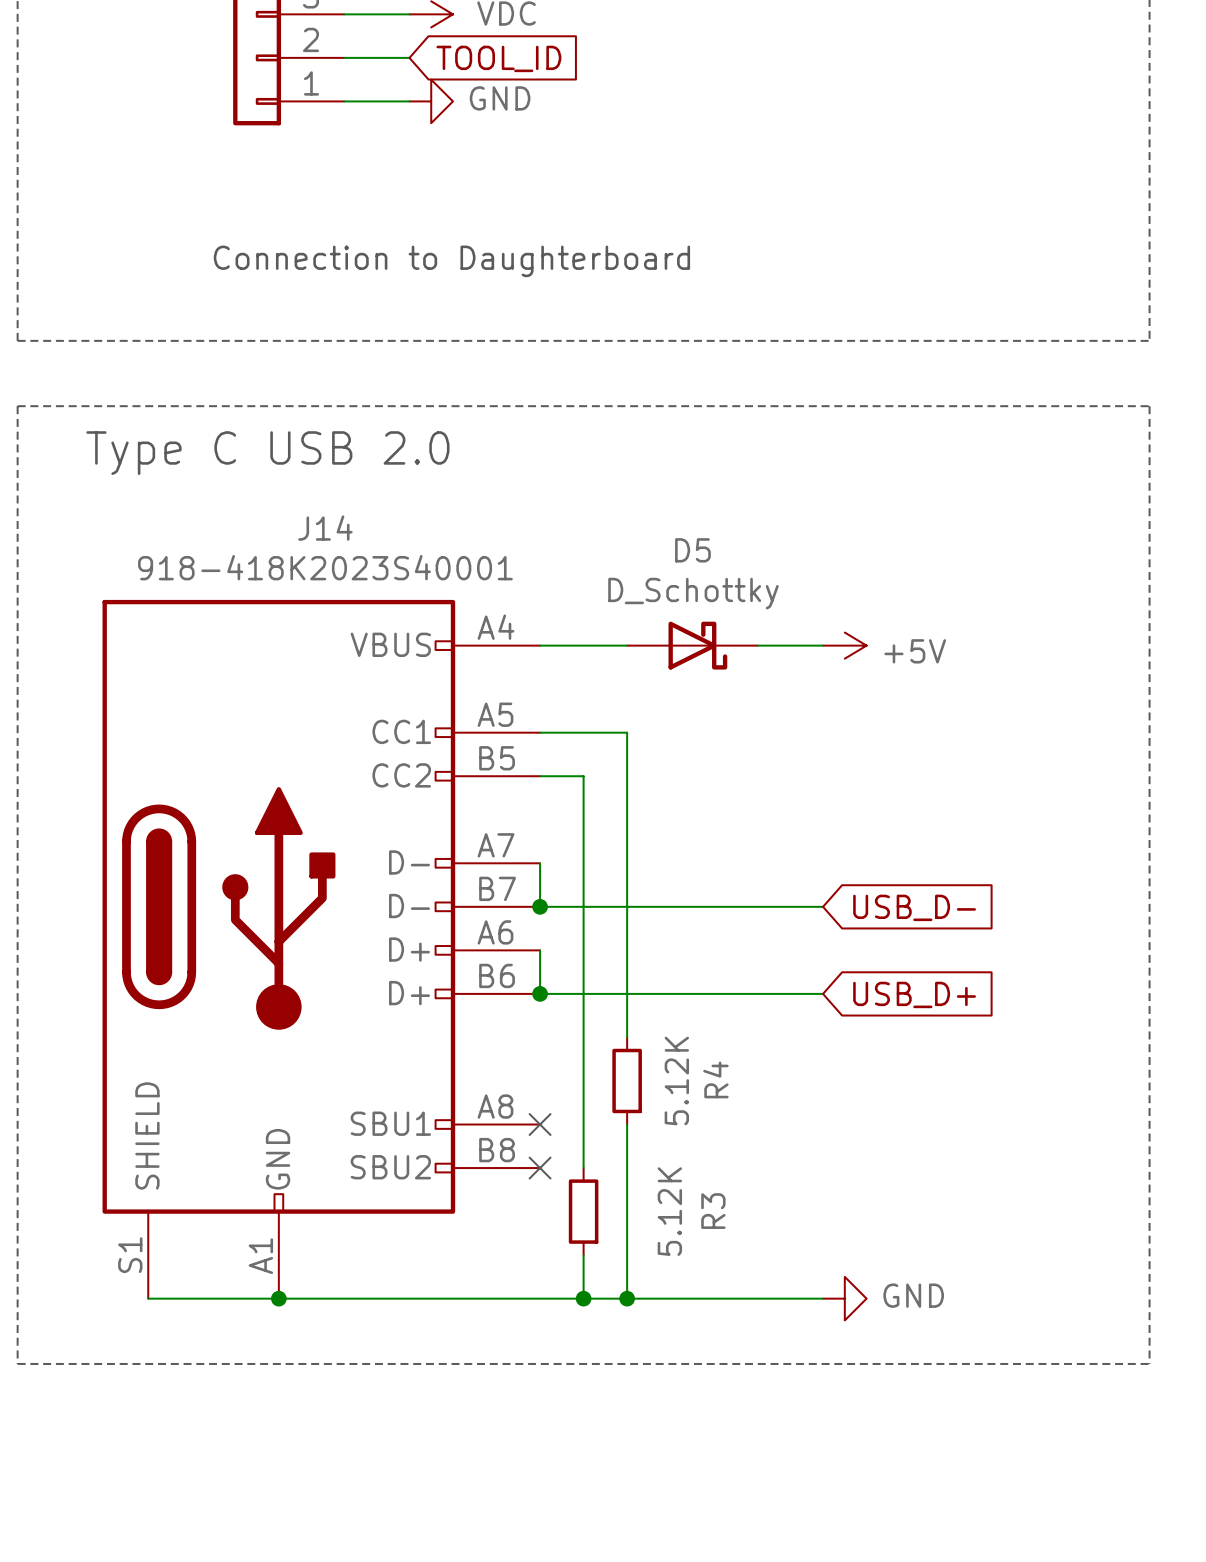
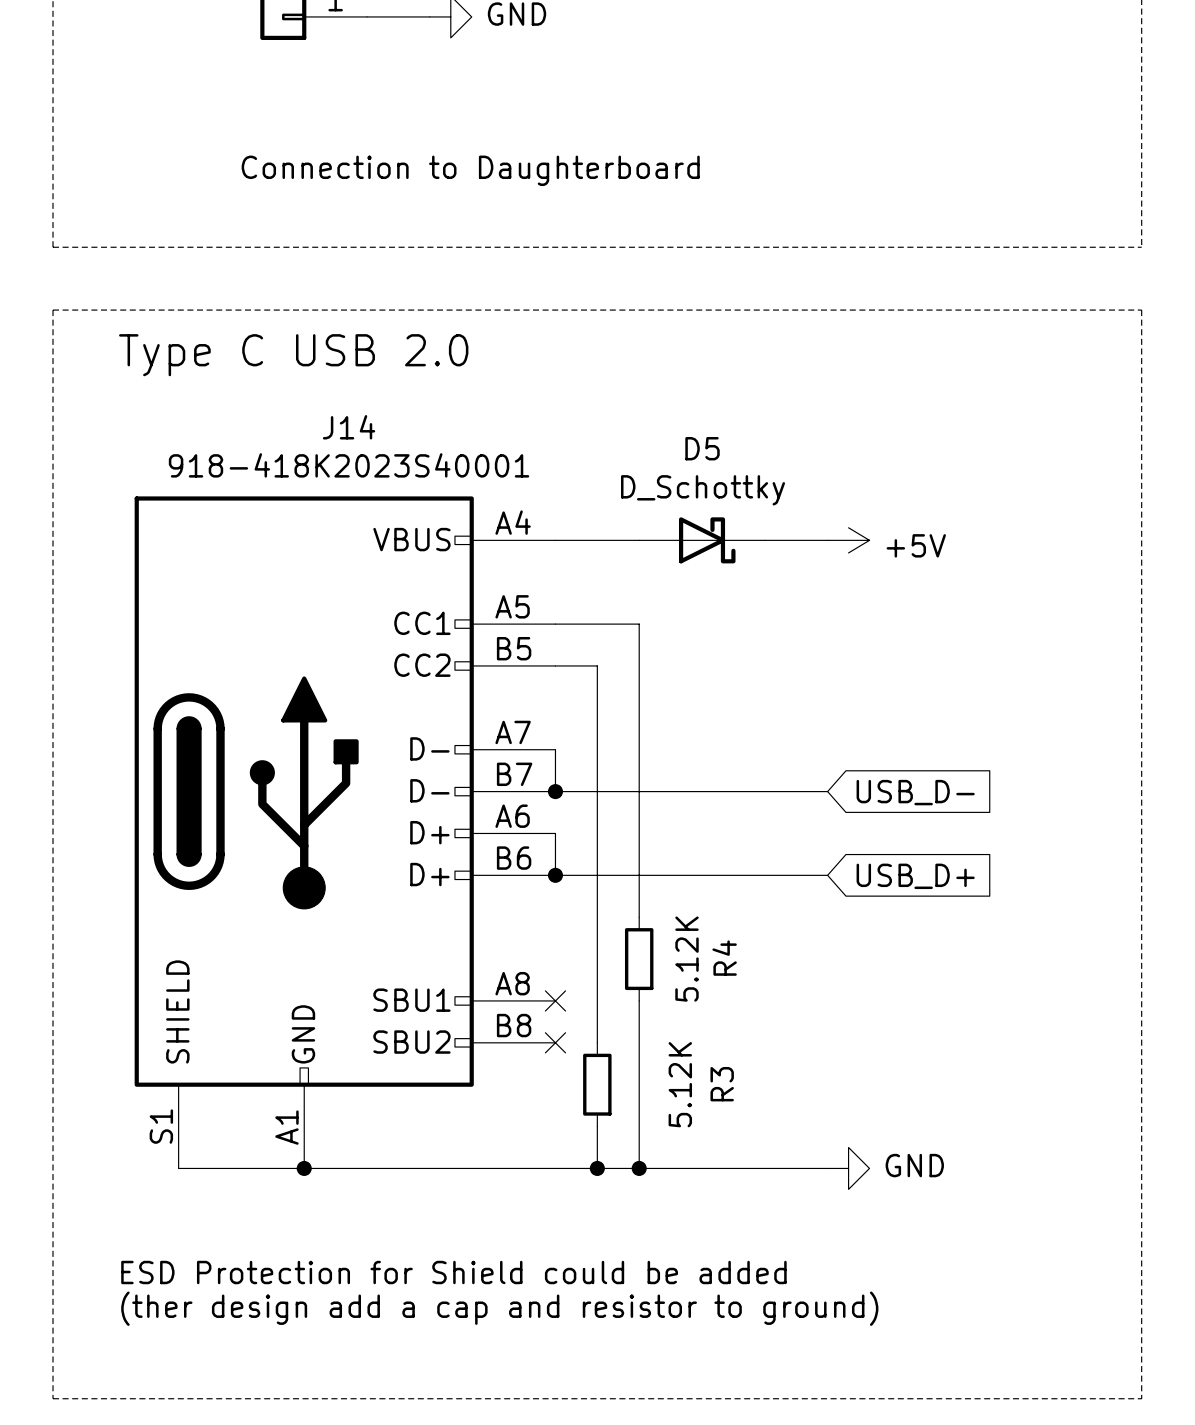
line: (17, 1363) (1149, 1363) -> (53, 1231) (53, 1398) (1141, 1398) (1141, 1231)
text: none -> ESD Protection for Shield could be added (453, 1272)
text: none -> (ther design add a cap and resistor to ground) (499, 1308)

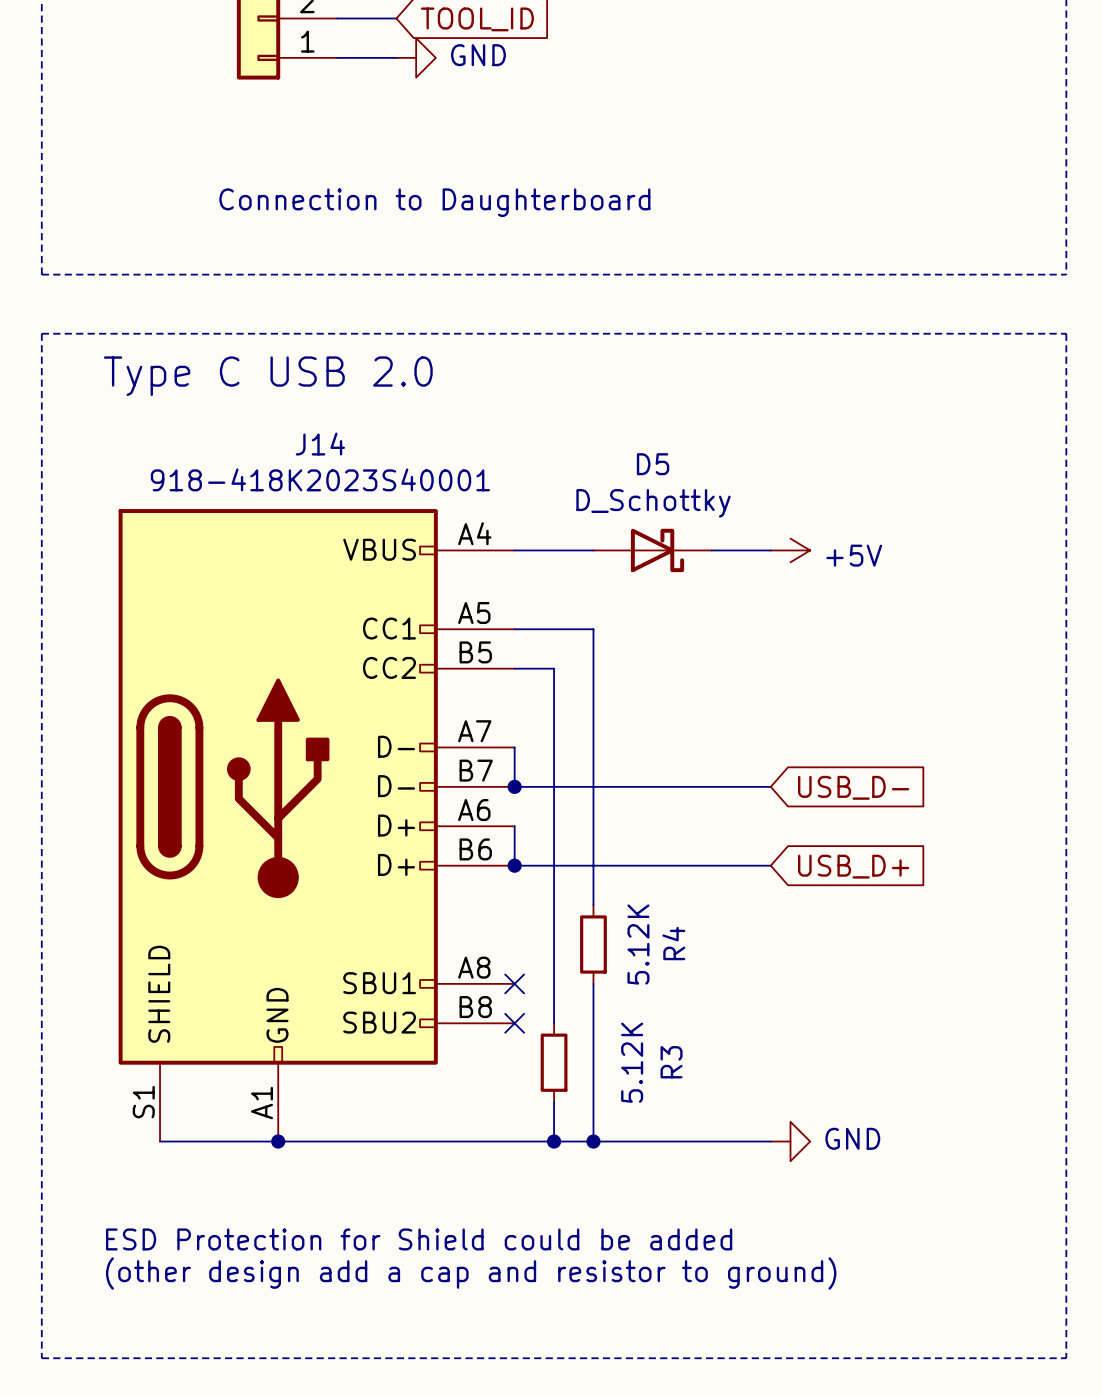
text: (ther design add a cap and resistor to ground) (499, 1308) -> (other design add a cap and resistor to ground) (471, 1273)

